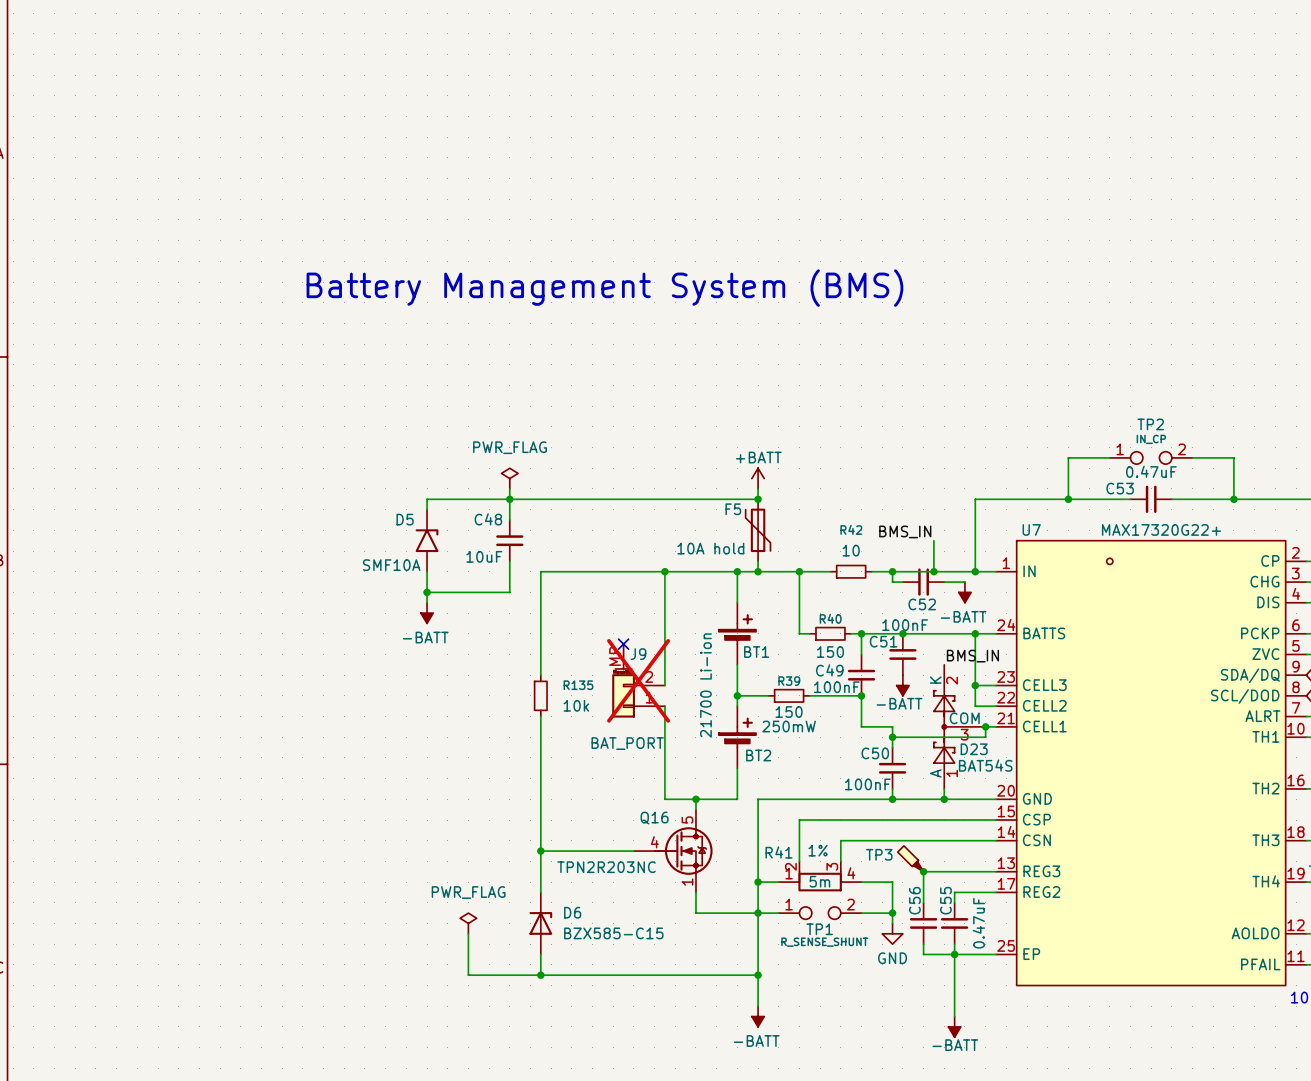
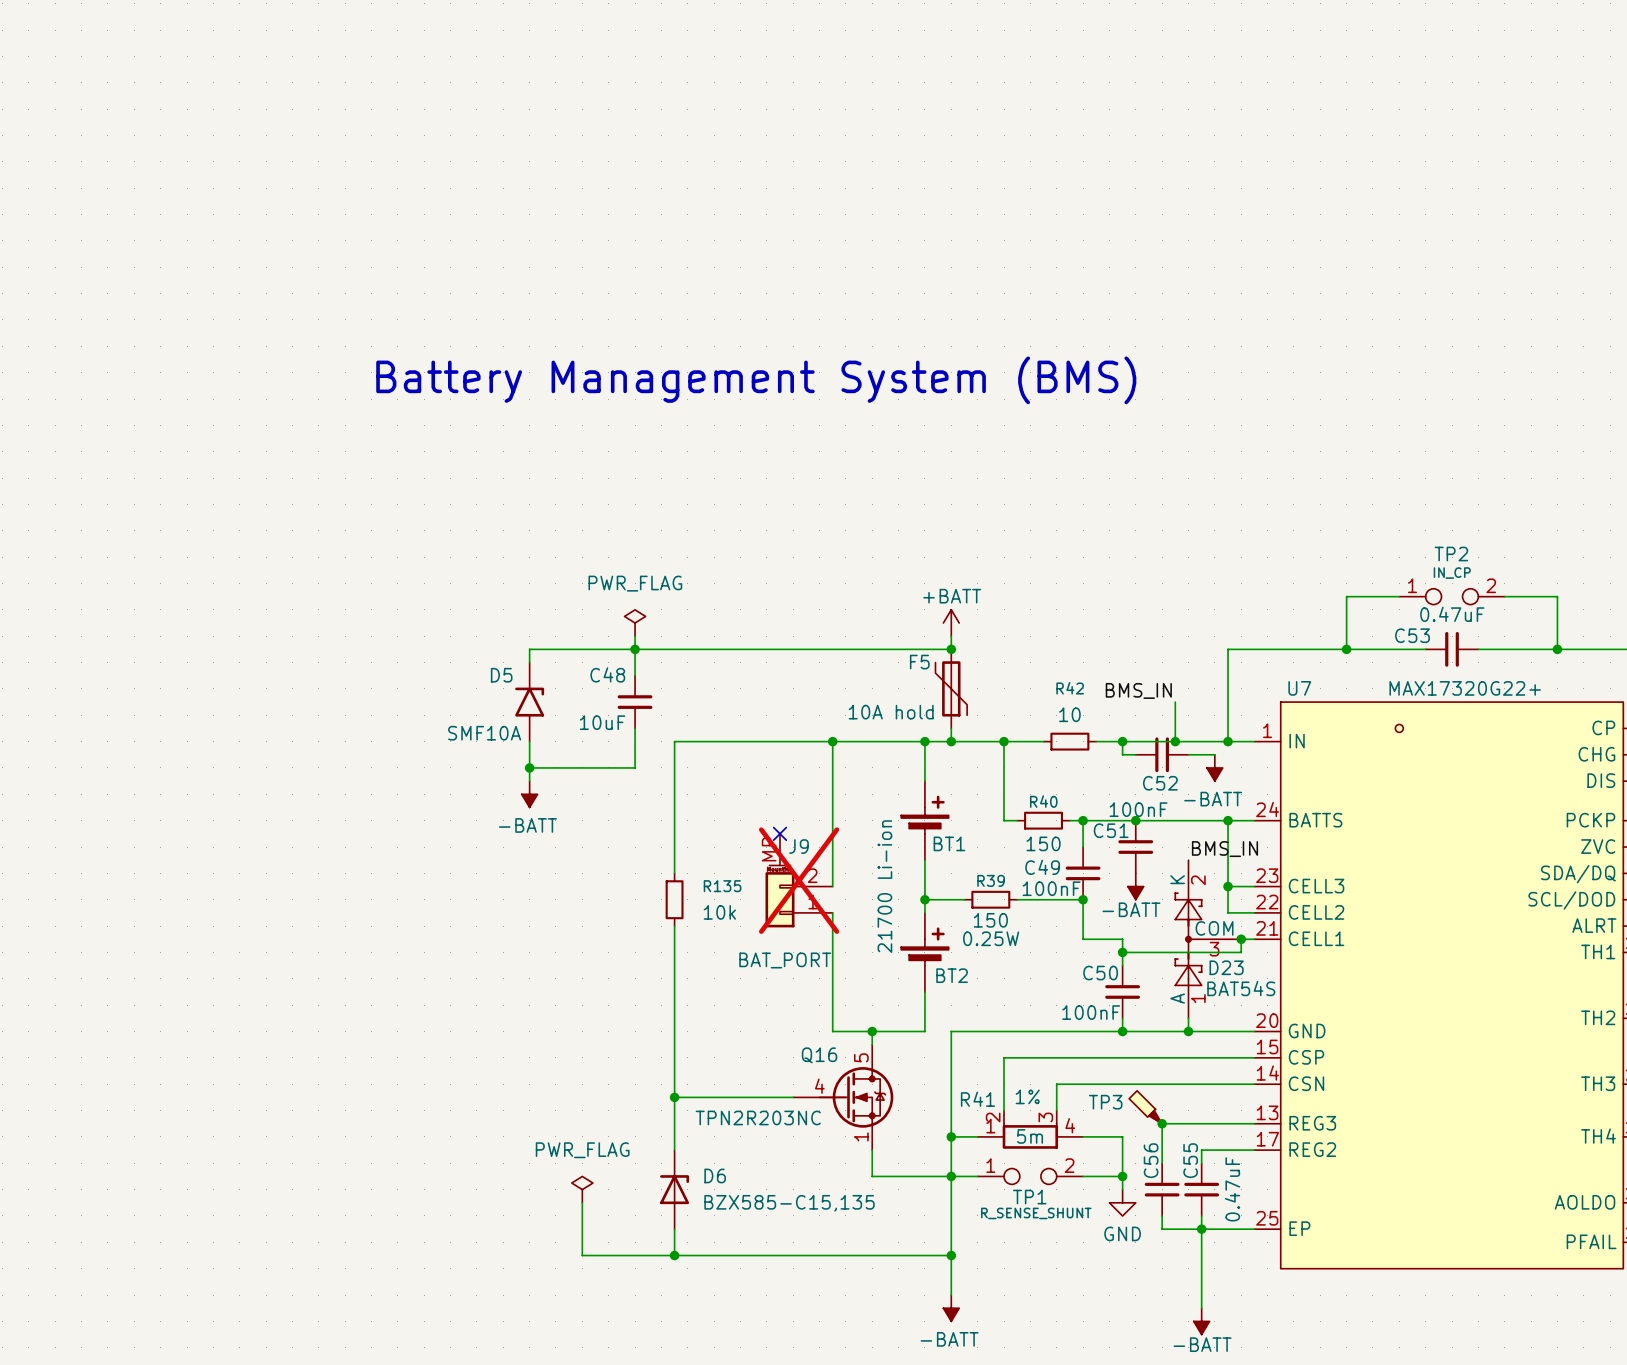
R39 text: 250mW (789, 726) -> 0.25W (991, 938)
D6 value: BZX585-C15 (613, 933) -> BZX585-C15,135 (789, 1203)

